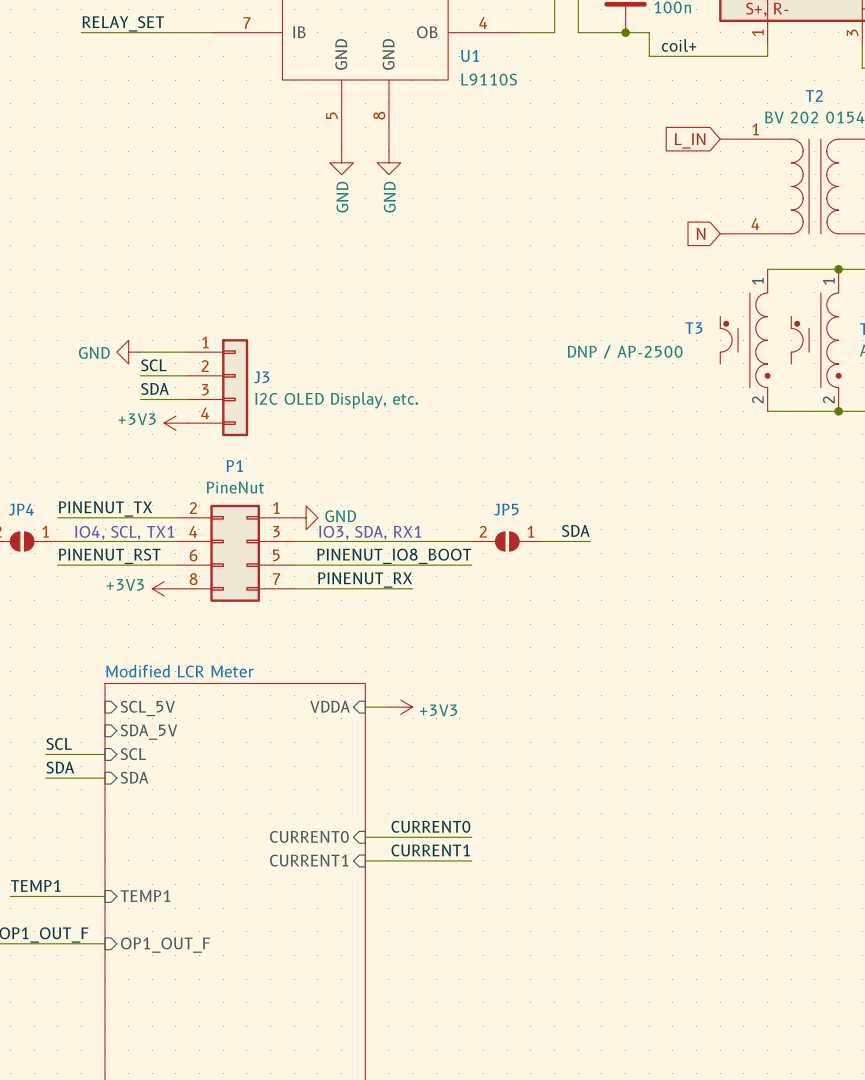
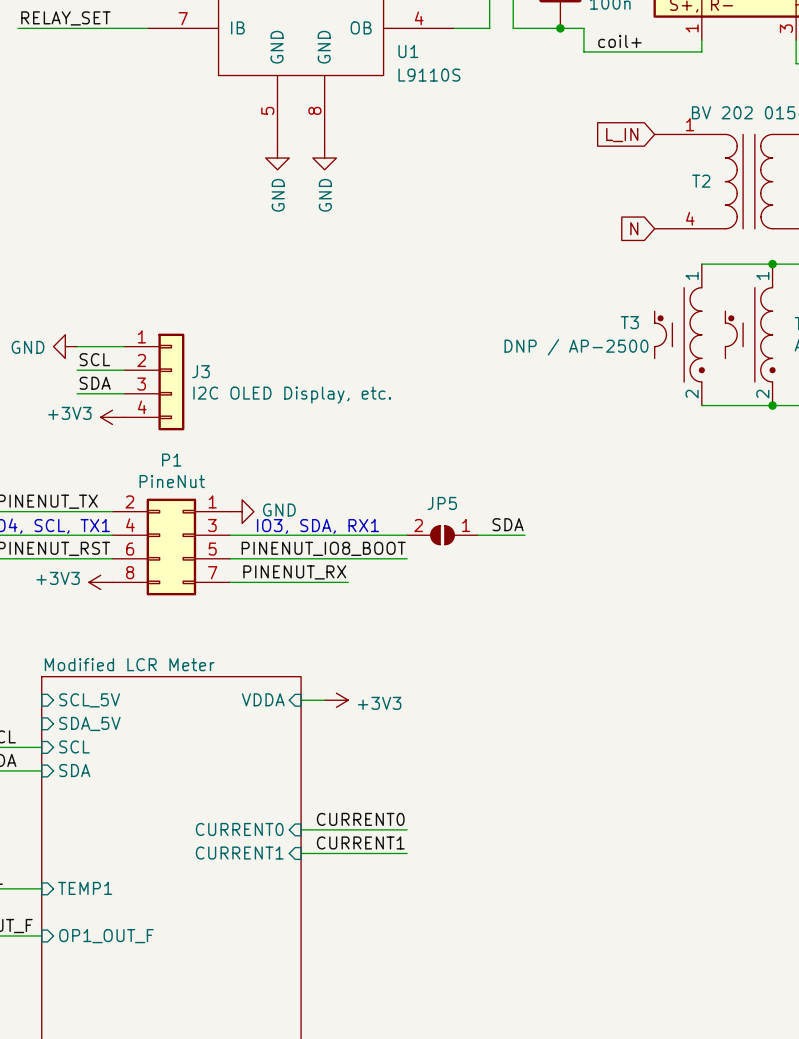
T2 name position: T2 (814, 95) -> T2 (701, 181)

